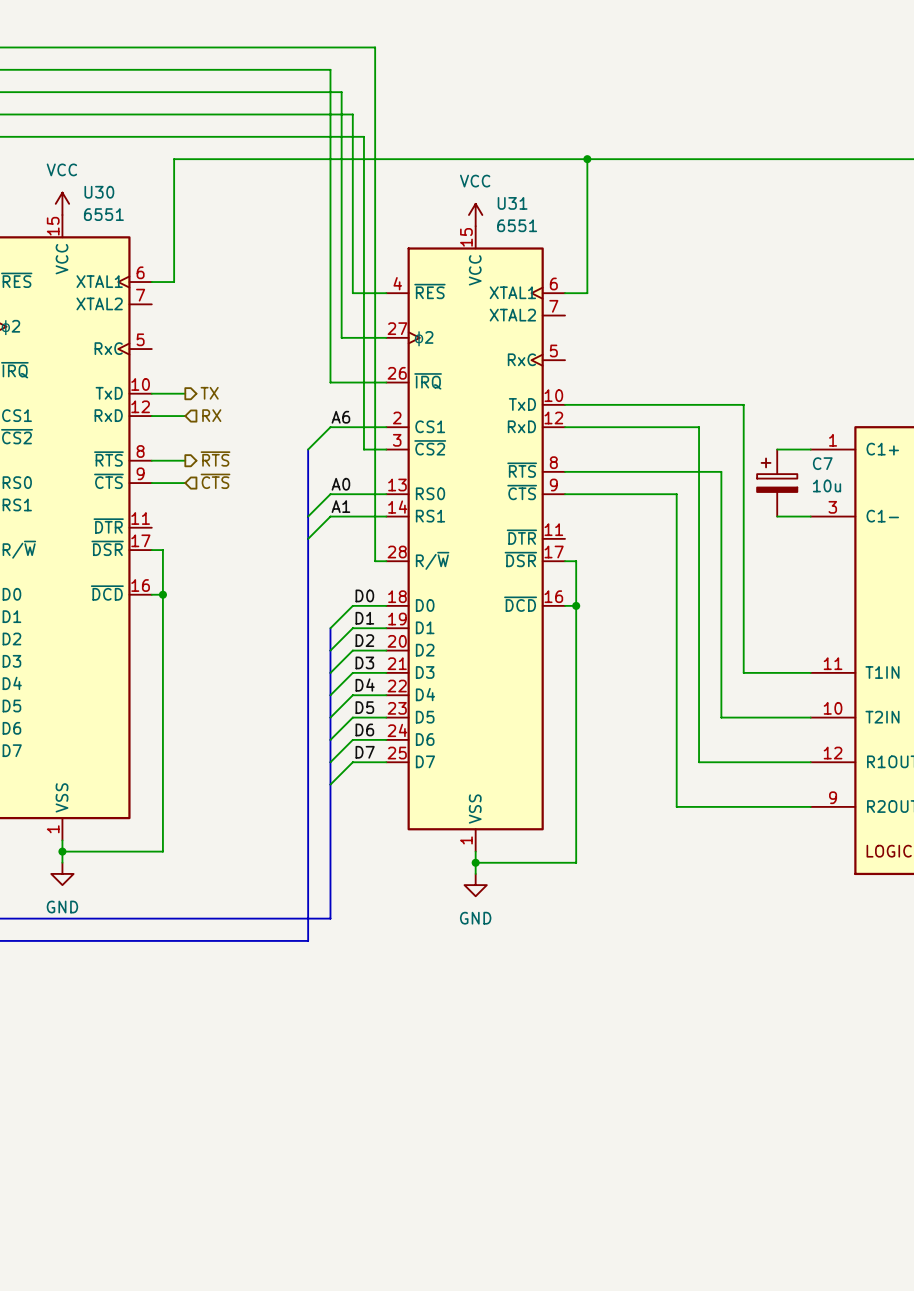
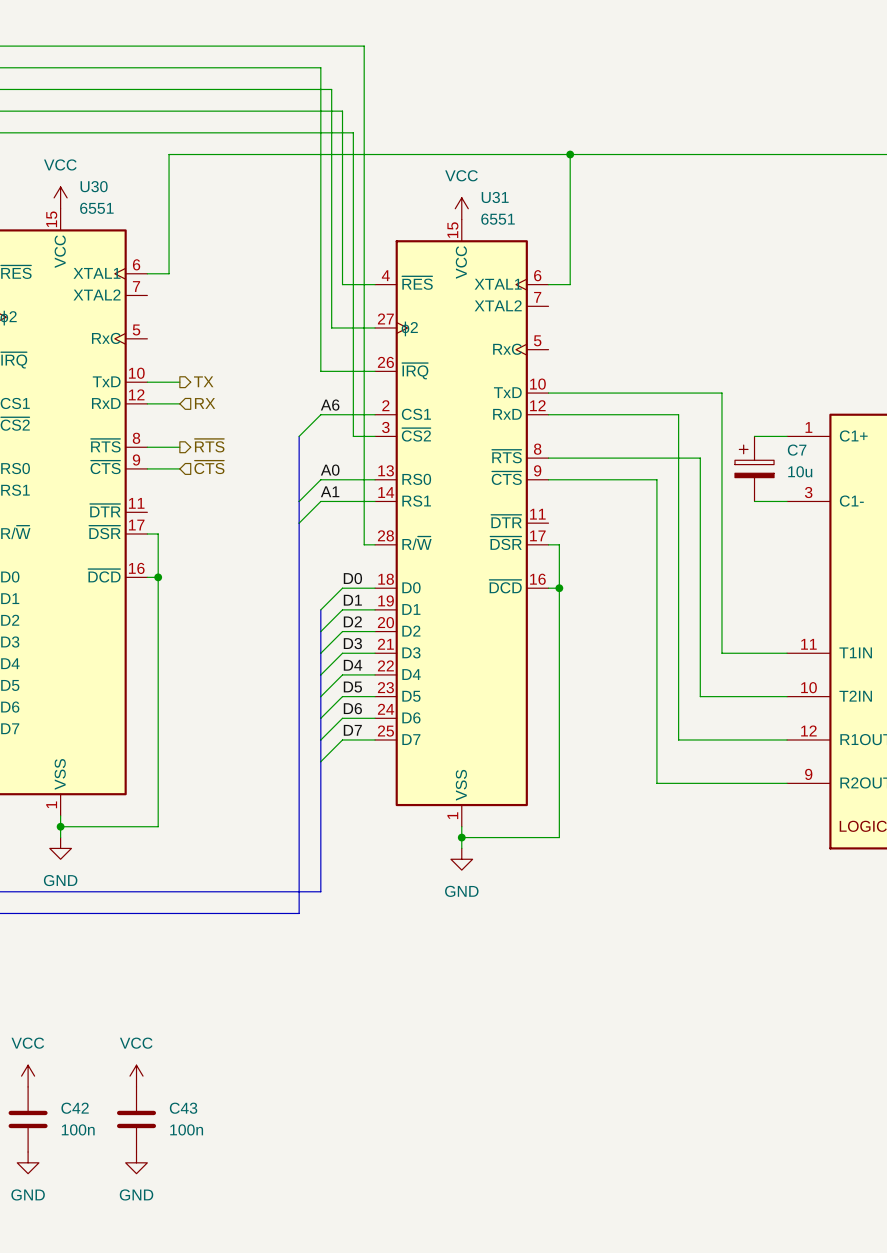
power symbol: none -> VCC (28, 1076)
power symbol: none -> VCC (136, 1076)
C42: none -> 100n (28, 1119)
C43: none -> 100n (136, 1119)
power symbol: none -> GND (28, 1162)
power symbol: none -> GND (136, 1162)

